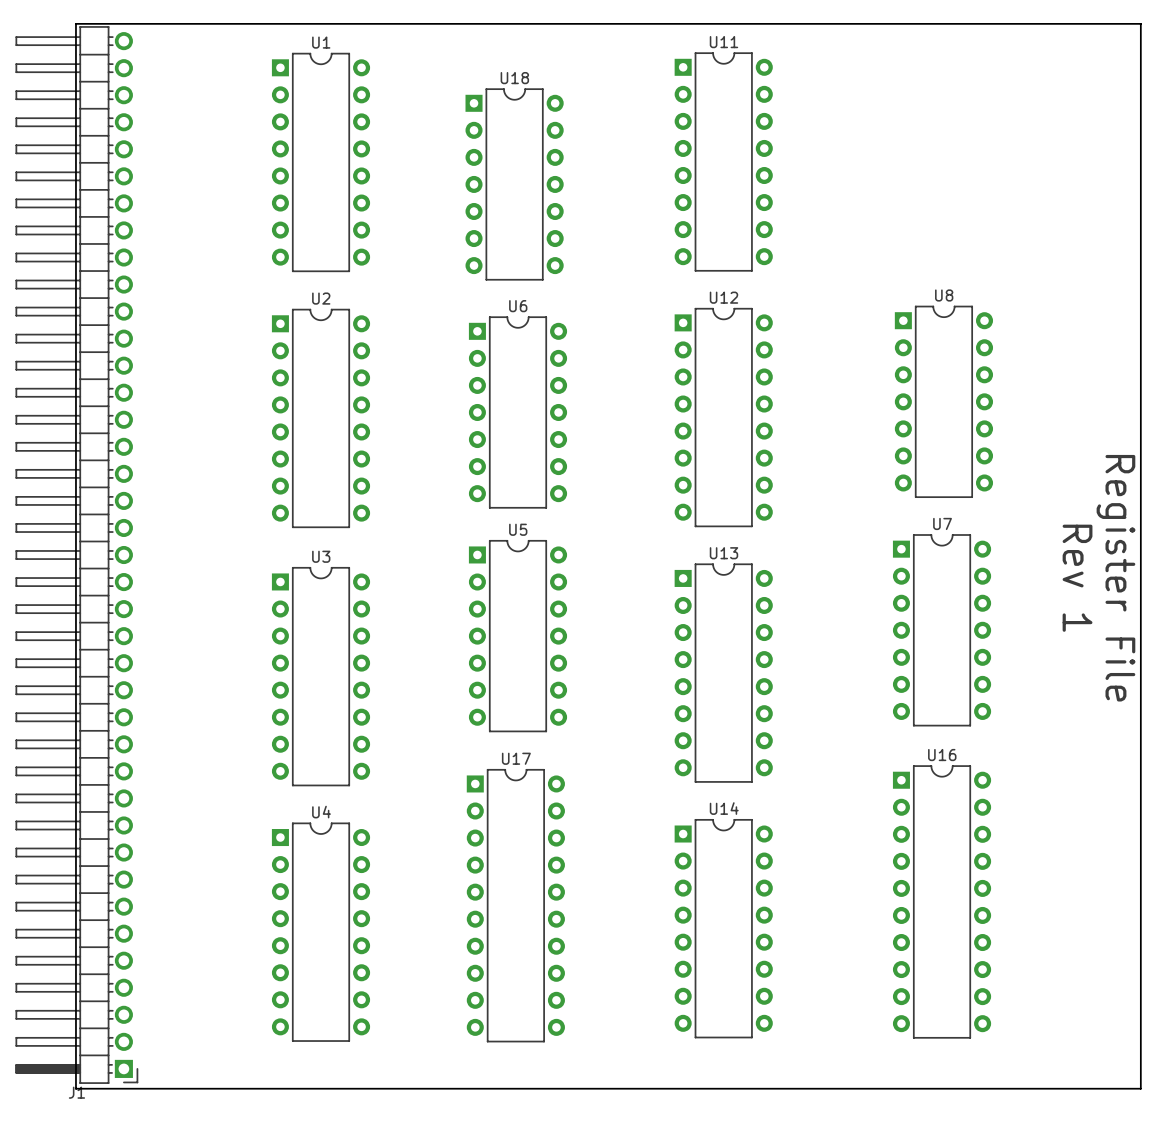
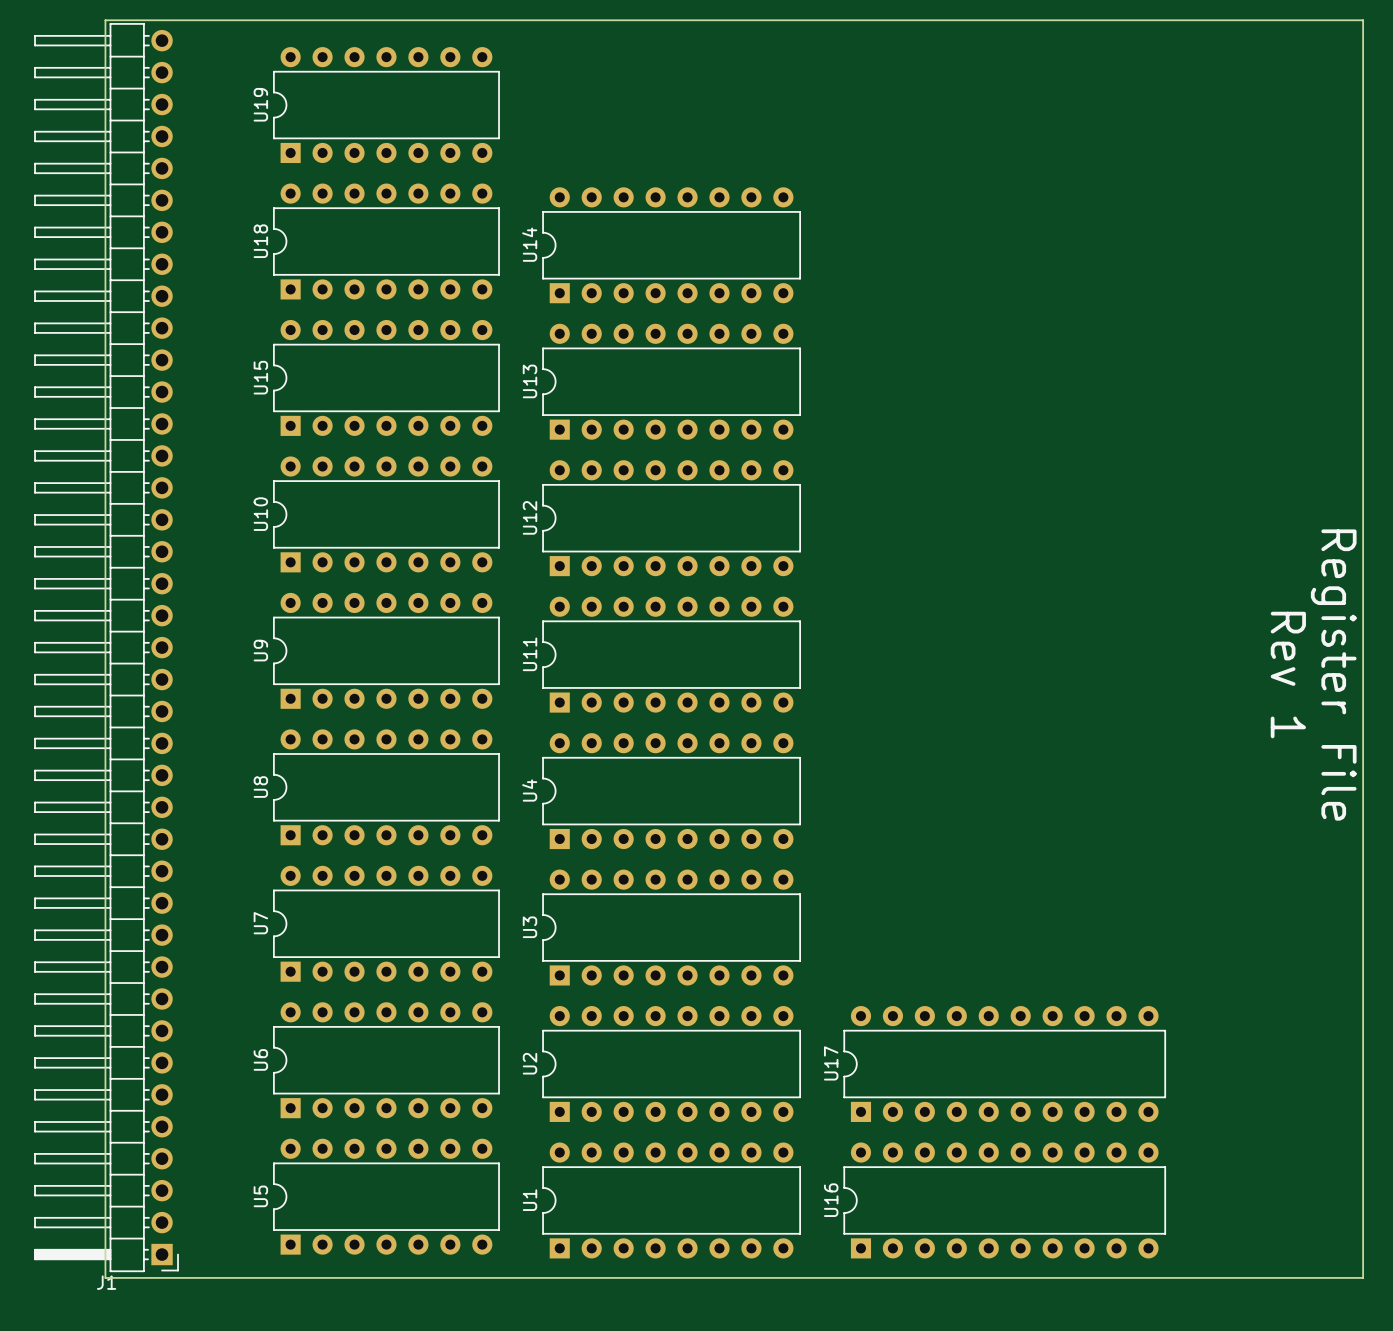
U19: none -> (386, 105)
U11 rotation: 0° (723, 161) -> 90° counterclockwise (671, 654)
U11 position: (723, 161) -> (671, 654)
U1 rotation: 0° (321, 162) -> 90° counterclockwise (671, 1200)
U1 position: (321, 162) -> (671, 1200)
U18 rotation: 0° (514, 184) -> 90° counterclockwise (386, 241)
U18 position: (514, 184) -> (386, 241)
U15: none -> (386, 377)
U8 rotation: 0° (943, 401) -> 90° counterclockwise (386, 787)
U8 position: (943, 401) -> (386, 787)
U6 rotation: 0° (518, 412) -> 90° counterclockwise (386, 1060)
U6 position: (518, 412) -> (386, 1060)
U12 rotation: 0° (723, 417) -> 90° counterclockwise (671, 518)
U12 position: (723, 417) -> (671, 518)
U2 rotation: 0° (321, 418) -> 90° counterclockwise (671, 1064)
U2 position: (321, 418) -> (671, 1064)
U10: none -> (386, 514)
U9: none -> (386, 650)
U7 rotation: 0° (942, 630) -> 90° counterclockwise (386, 923)
U7 position: (942, 630) -> (386, 923)
U5 rotation: 0° (518, 636) -> 90° counterclockwise (386, 1196)
U5 position: (518, 636) -> (386, 1196)
U13 rotation: 0° (723, 673) -> 90° counterclockwise (671, 381)
U13 position: (723, 673) -> (671, 381)
U3 rotation: 0° (321, 676) -> 90° counterclockwise (671, 927)
U3 position: (321, 676) -> (671, 927)
U16 rotation: 0° (942, 901) -> 90° counterclockwise (1004, 1200)
U17 rotation: 0° (515, 905) -> 90° counterclockwise (1004, 1064)
U17 position: (515, 905) -> (1004, 1064)
U14 rotation: 0° (723, 928) -> 90° counterclockwise (671, 245)
U14 position: (723, 928) -> (671, 245)
U4 rotation: 0° (321, 932) -> 90° counterclockwise (671, 791)
U4 position: (321, 932) -> (671, 791)

